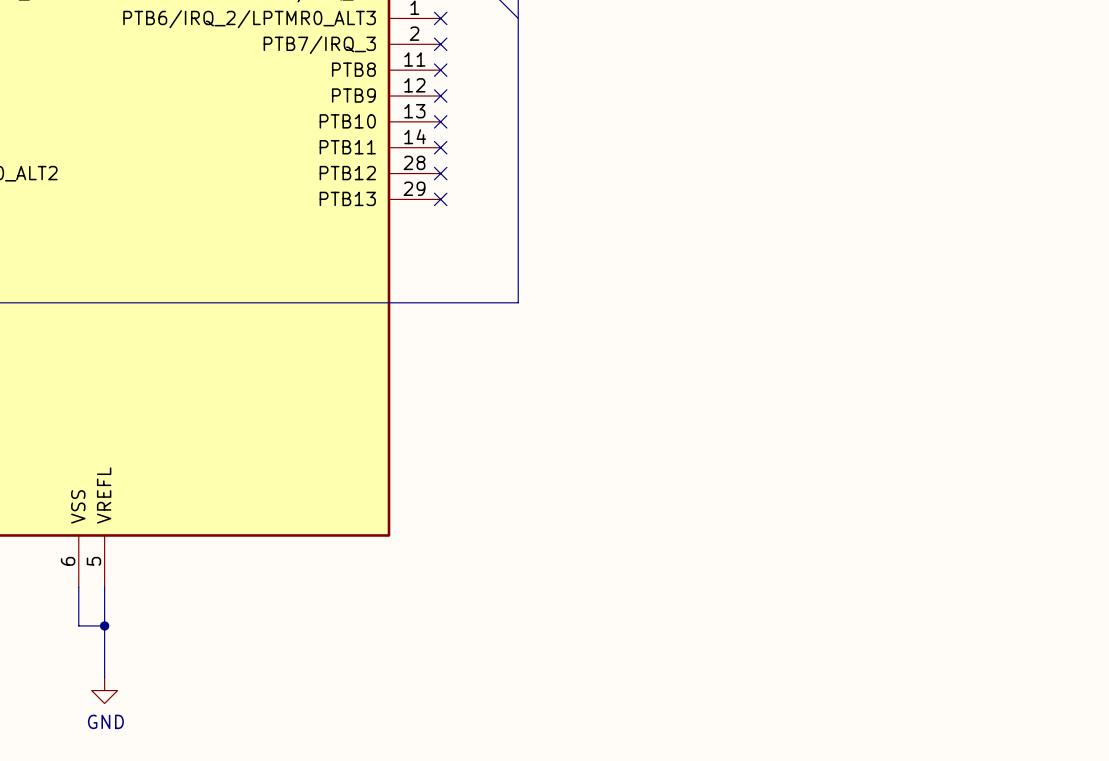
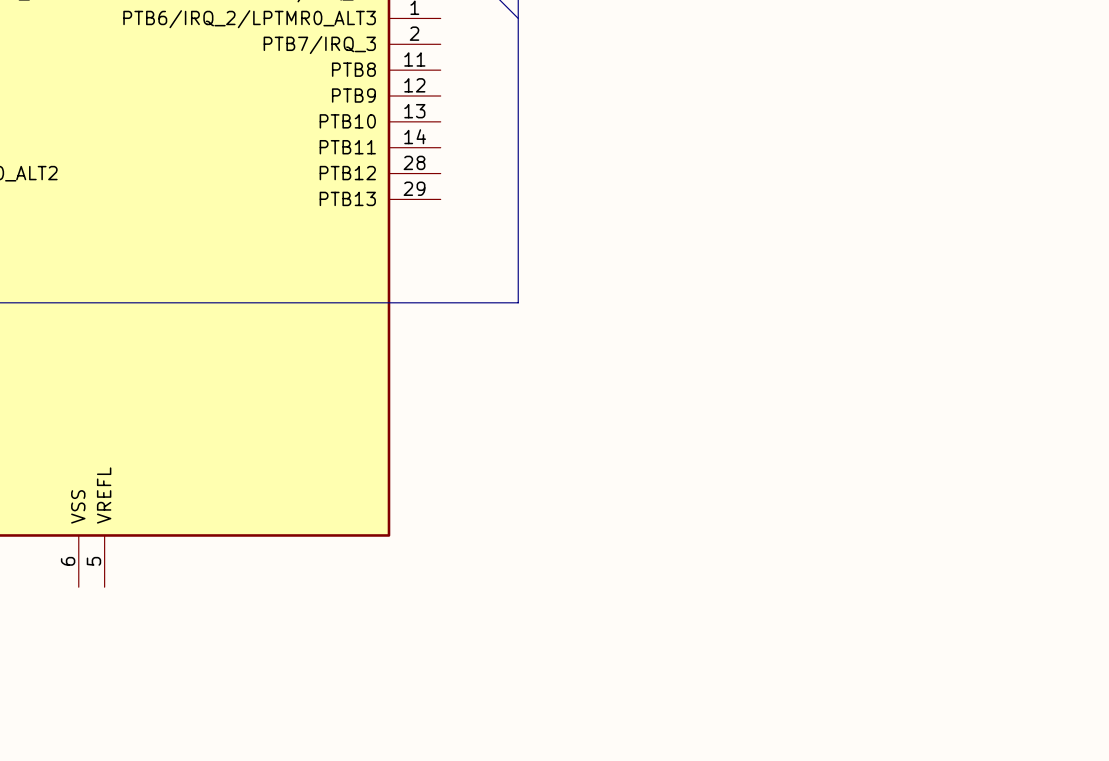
no-connect mark: (440, 18) -> none
no-connect mark: (440, 44) -> none
no-connect mark: (440, 70) -> none
no-connect mark: (440, 96) -> none
no-connect mark: (440, 121) -> none
no-connect mark: (440, 147) -> none
no-connect mark: (440, 173) -> none
no-connect mark: (440, 199) -> none
wire: (78, 587) (78, 625) (104, 625) -> none
wire: (104, 587) (104, 677) -> none
junction: (104, 625) -> none
power symbol: GND (104, 690) -> none

